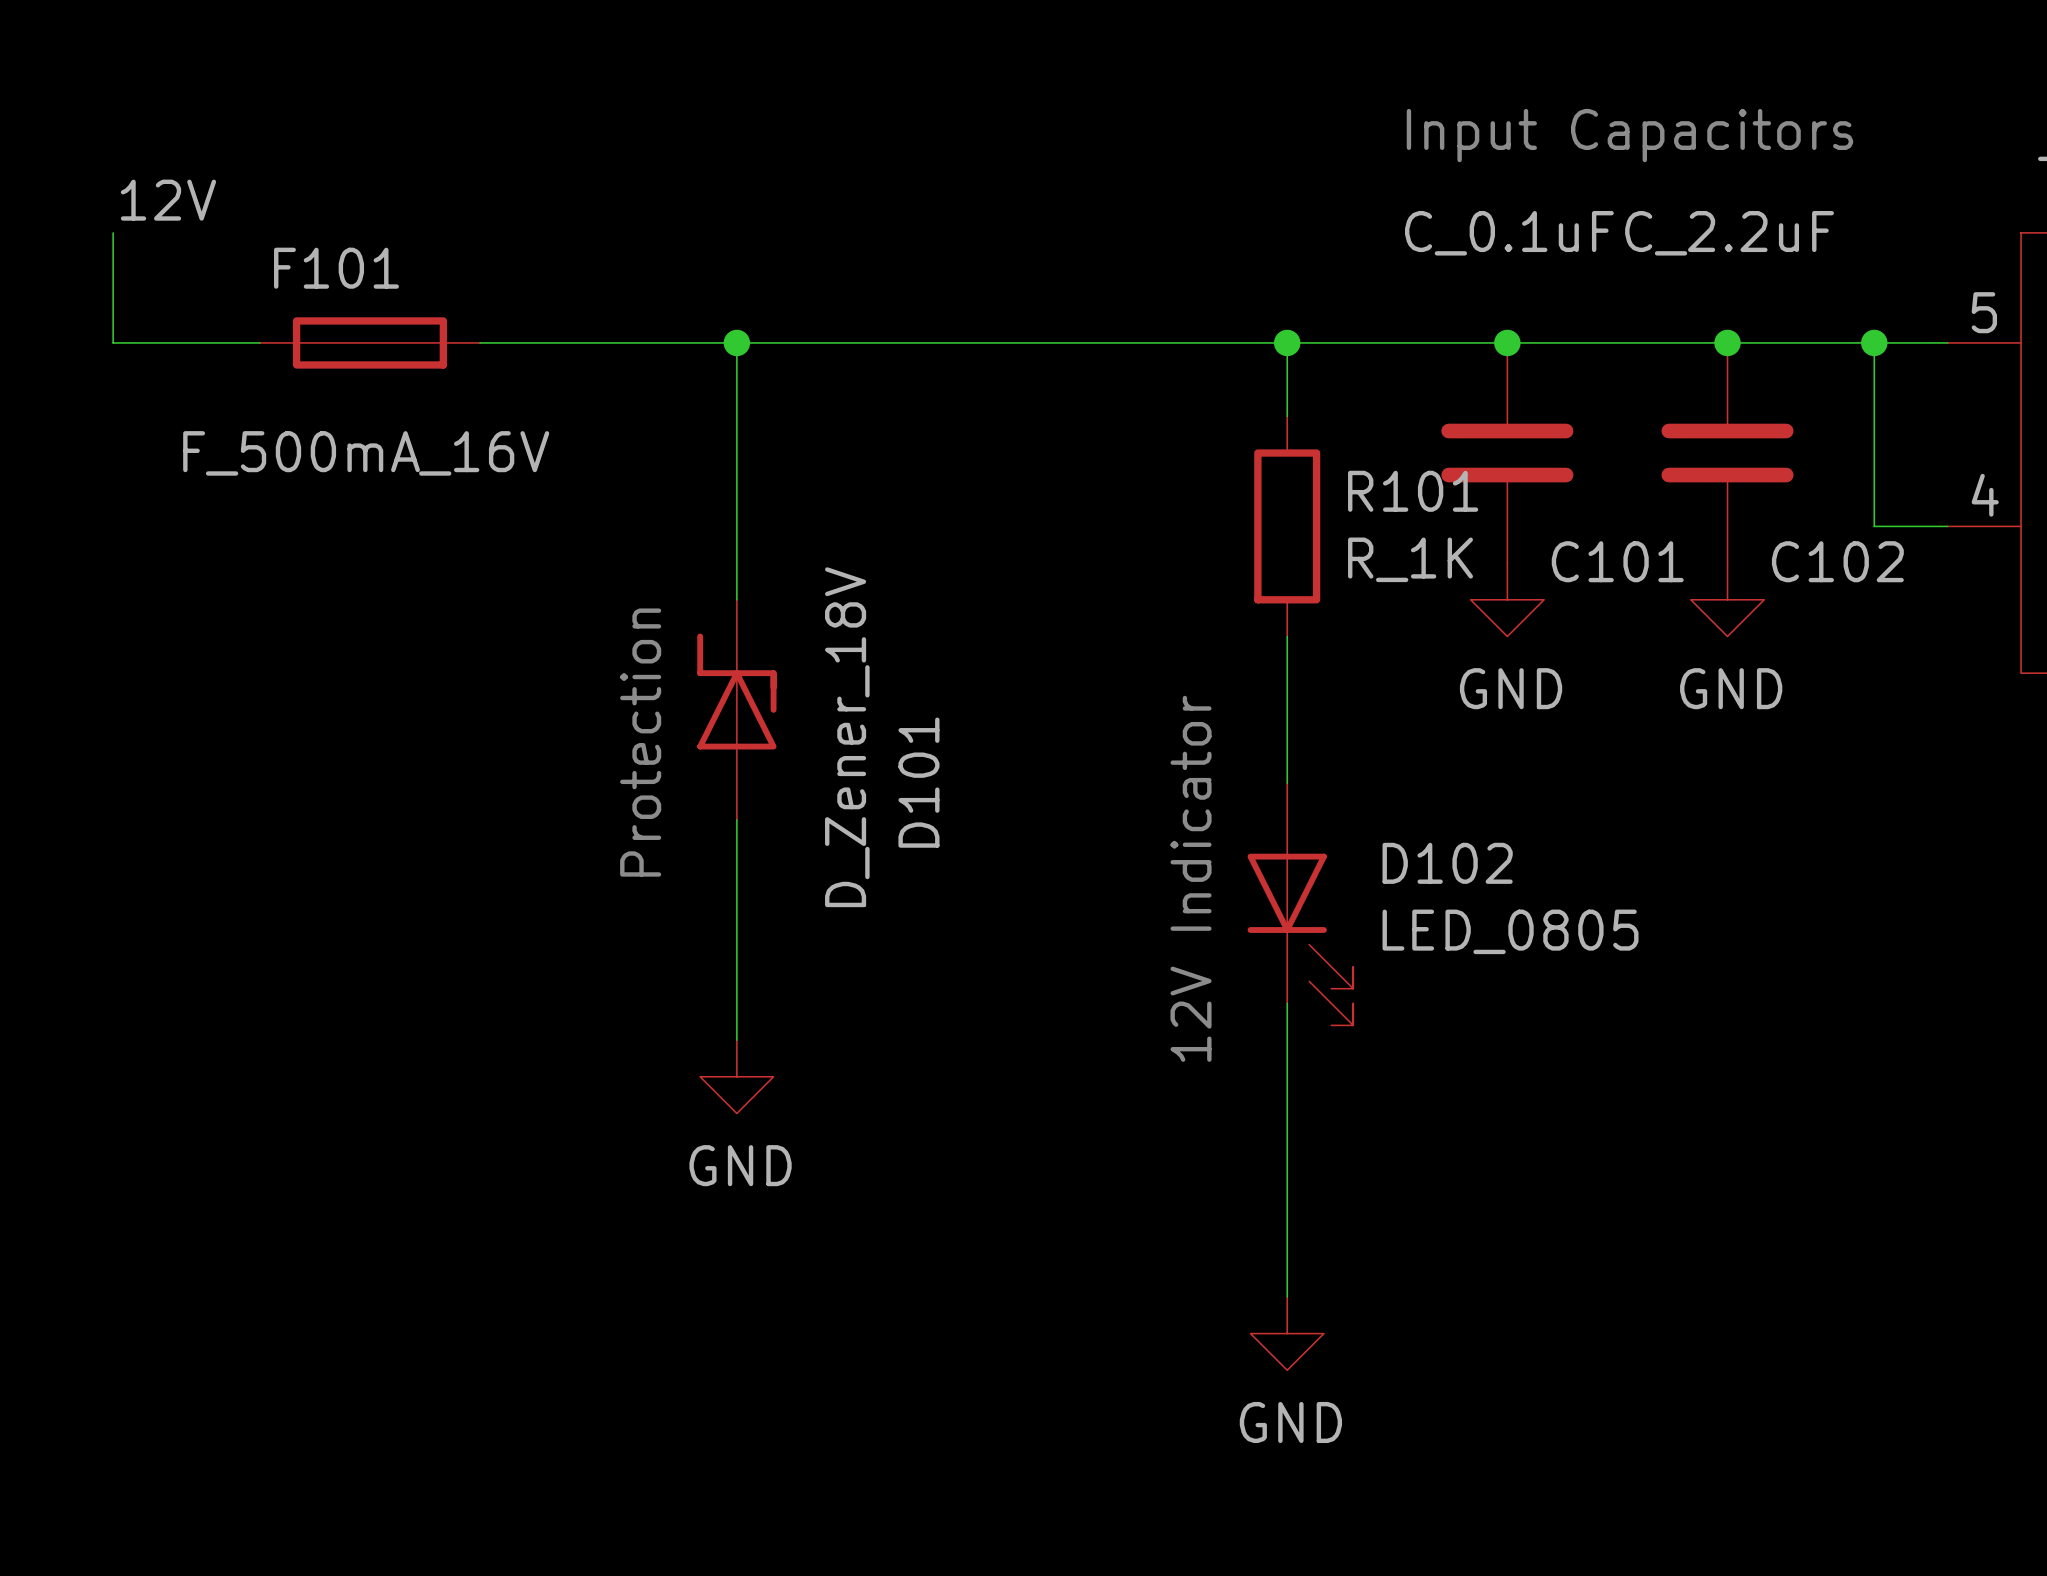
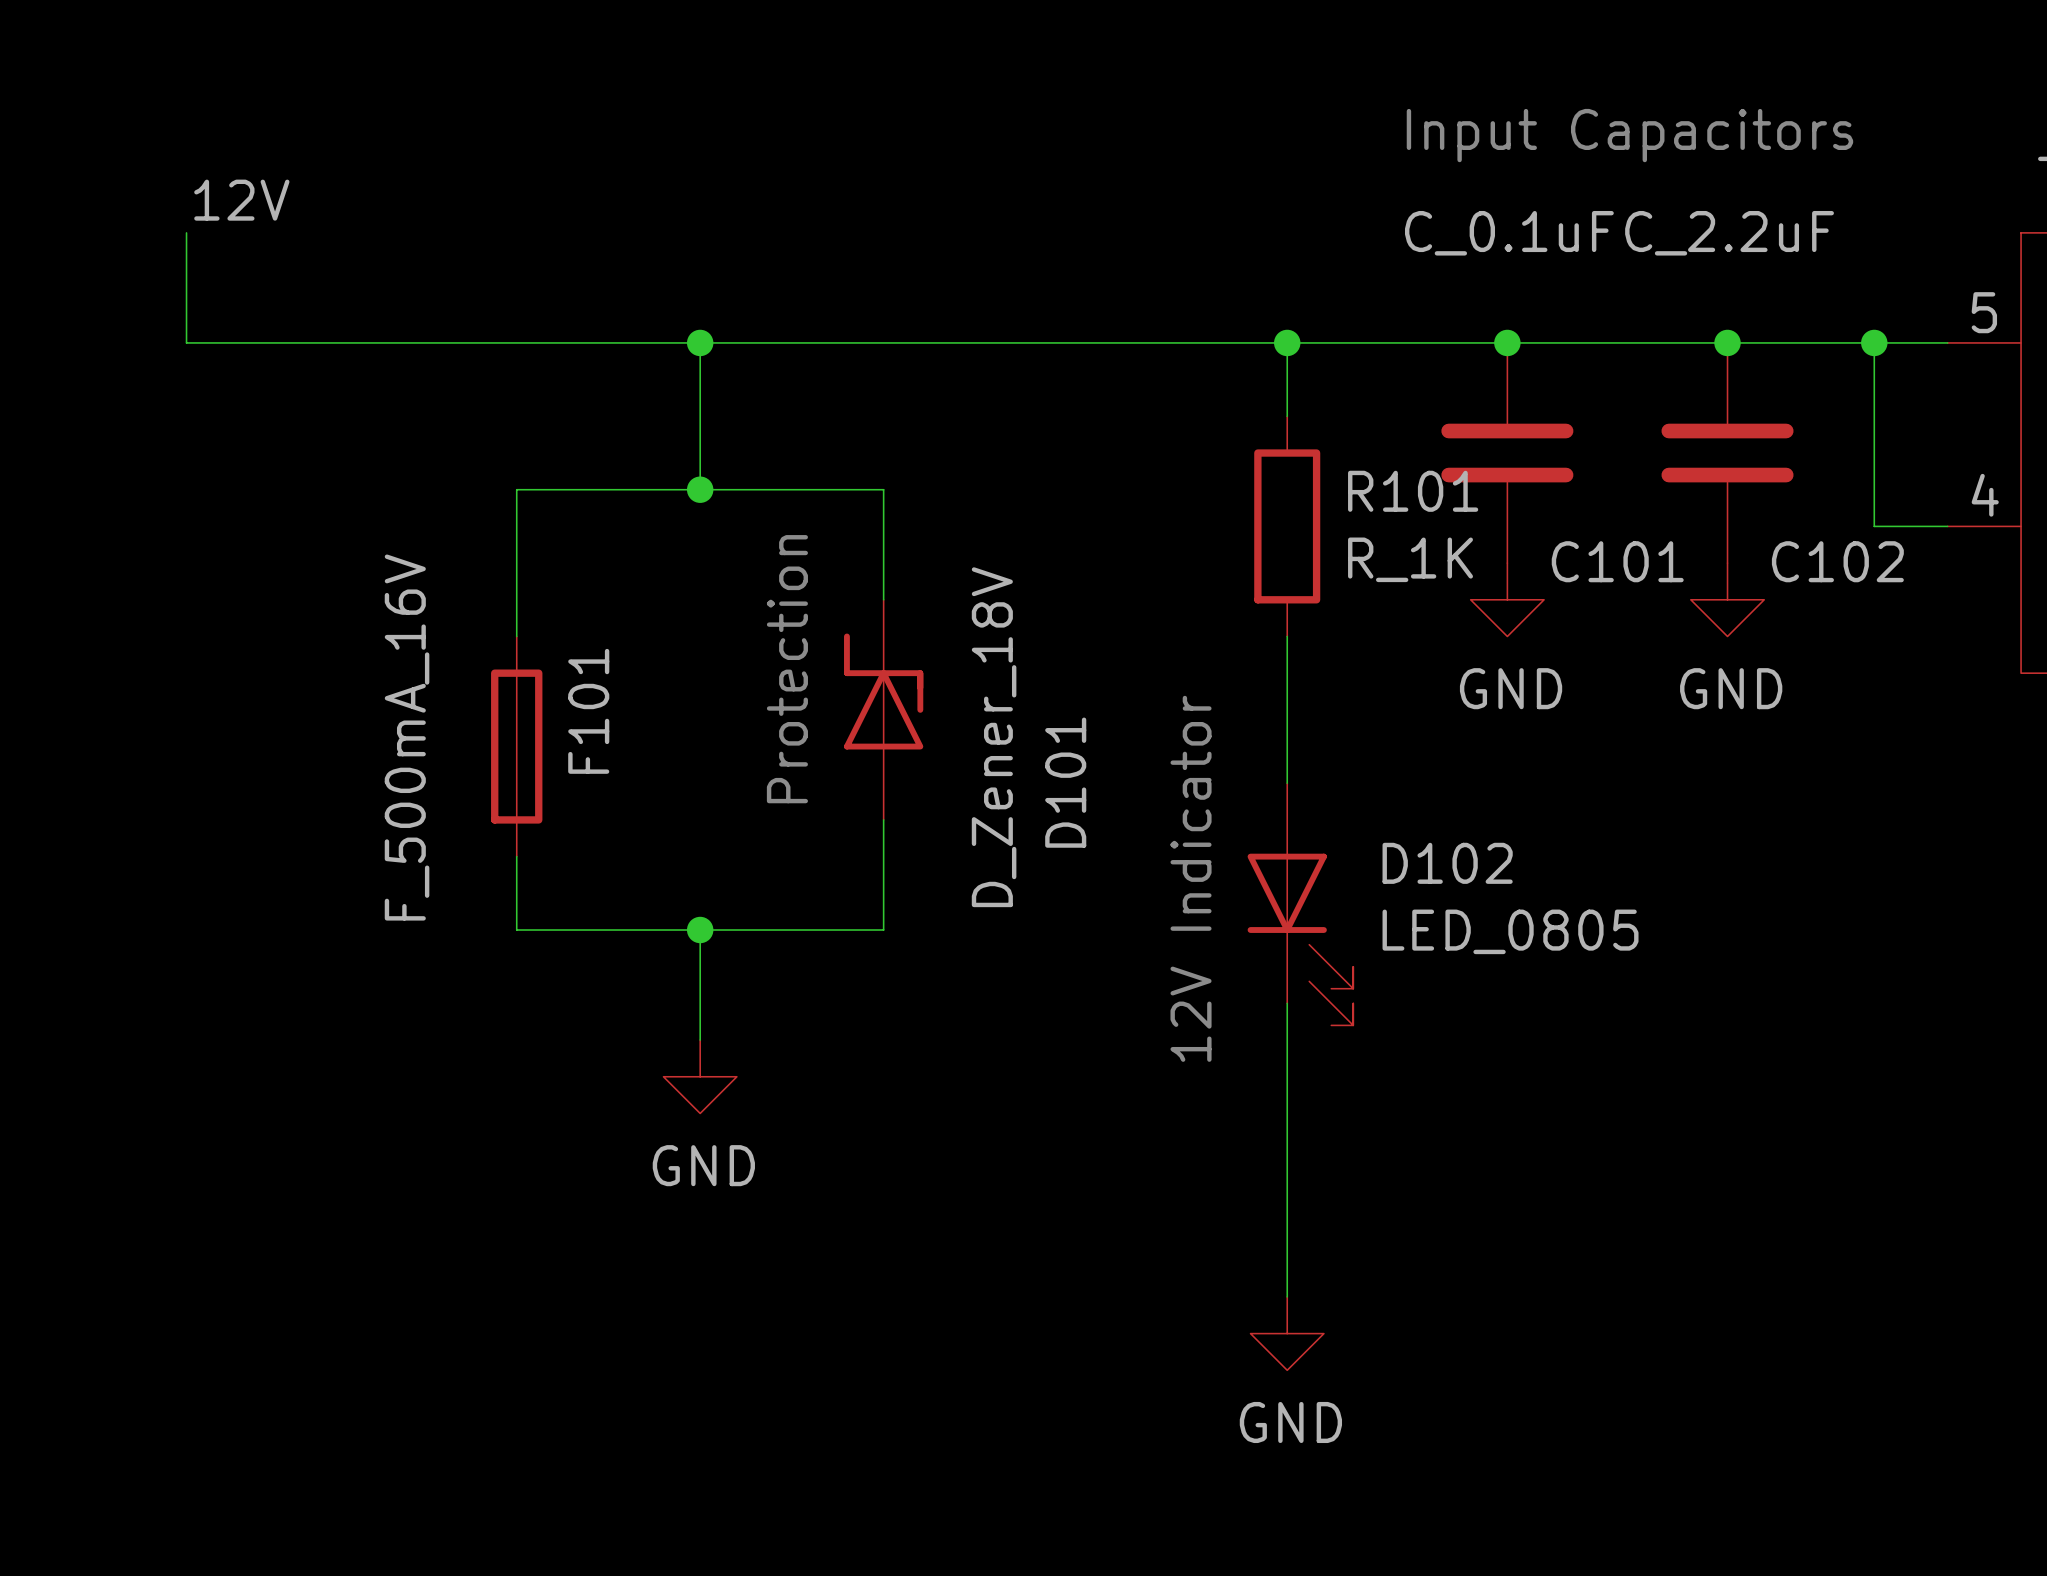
label position: 12V (168, 200) -> 12V (241, 200)
wire: (113, 232) (113, 342) (186, 342) -> (186, 232) (186, 342)
F101 rotation: 0° (369, 342) -> 90° clockwise (516, 746)
F101 position: (369, 342) -> (516, 746)
wire: none -> (700, 342) (700, 489)
wire: (736, 342) (736, 599) -> none
junction position: (736, 342) -> (700, 342)
junction: none -> (700, 489)
wire: none -> (883, 599) (883, 489) (516, 489) (516, 636)
D101 position: (736, 709) -> (883, 709)
text position: Protection (640, 742) -> Protection (787, 669)
wire: (736, 819) (736, 1040) -> none
wire: none -> (883, 819) (883, 930) (516, 930) (516, 856)
wire: none -> (700, 930) (700, 1040)
junction: none -> (700, 930)
power symbol position: GND (736, 1076) -> GND (700, 1076)

